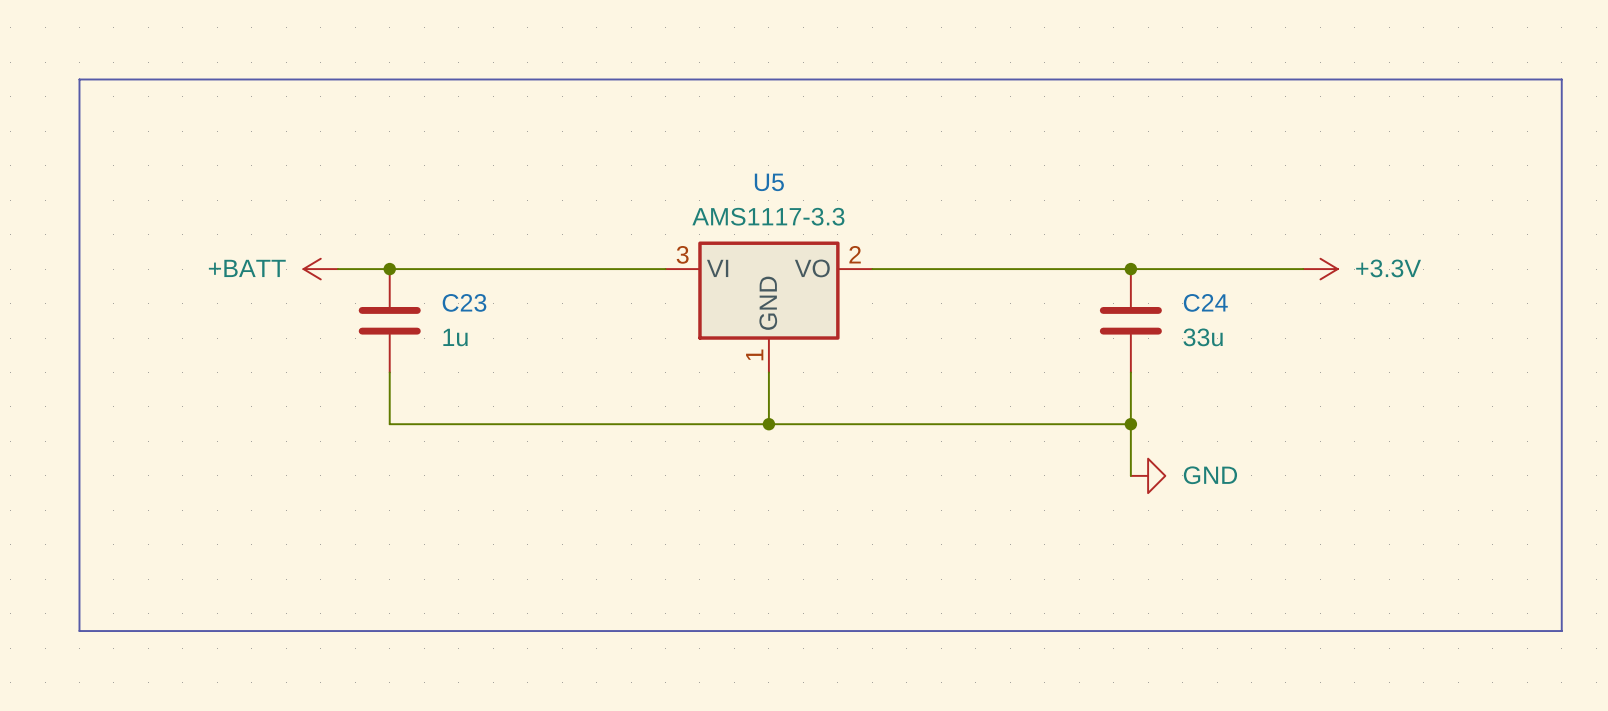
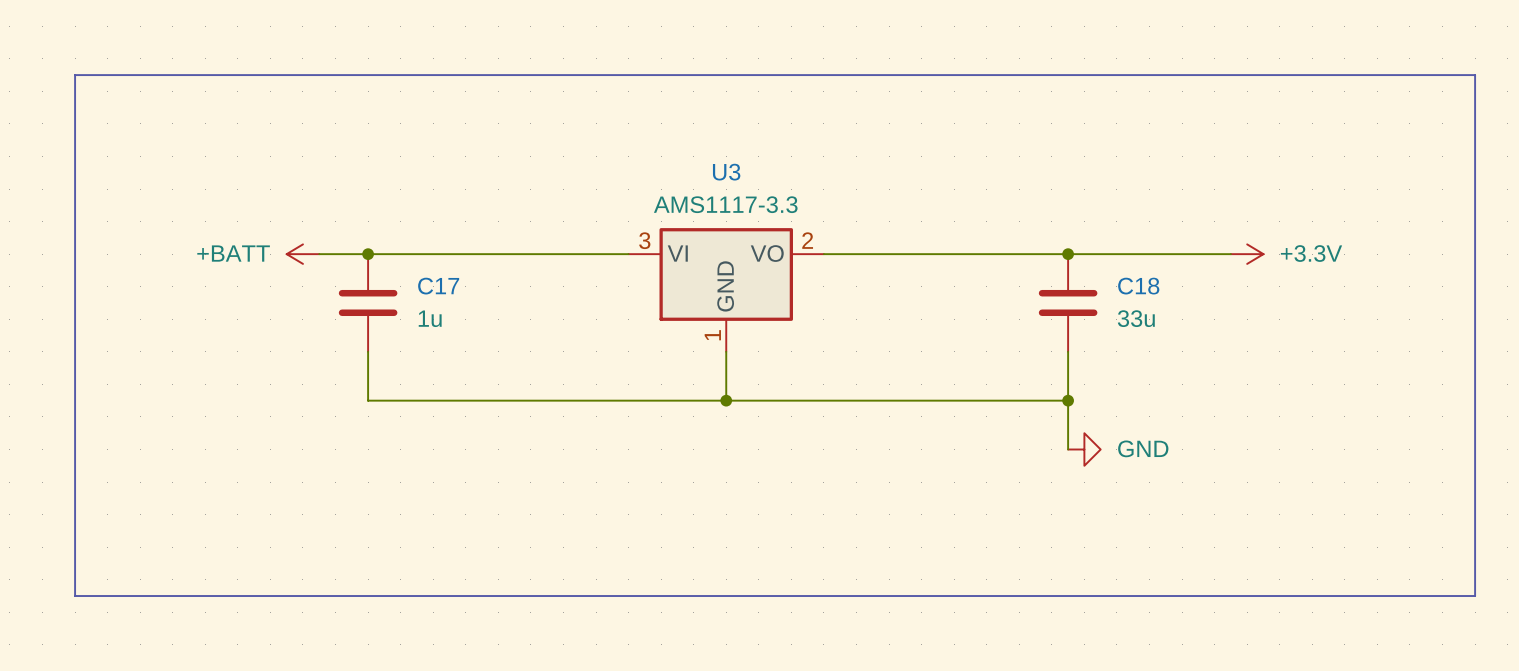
U5 name: U5 (769, 182) -> U3 (726, 172)
C23 name: C23 (464, 302) -> C17 (438, 286)
C24 name: C24 (1205, 302) -> C18 (1138, 286)

